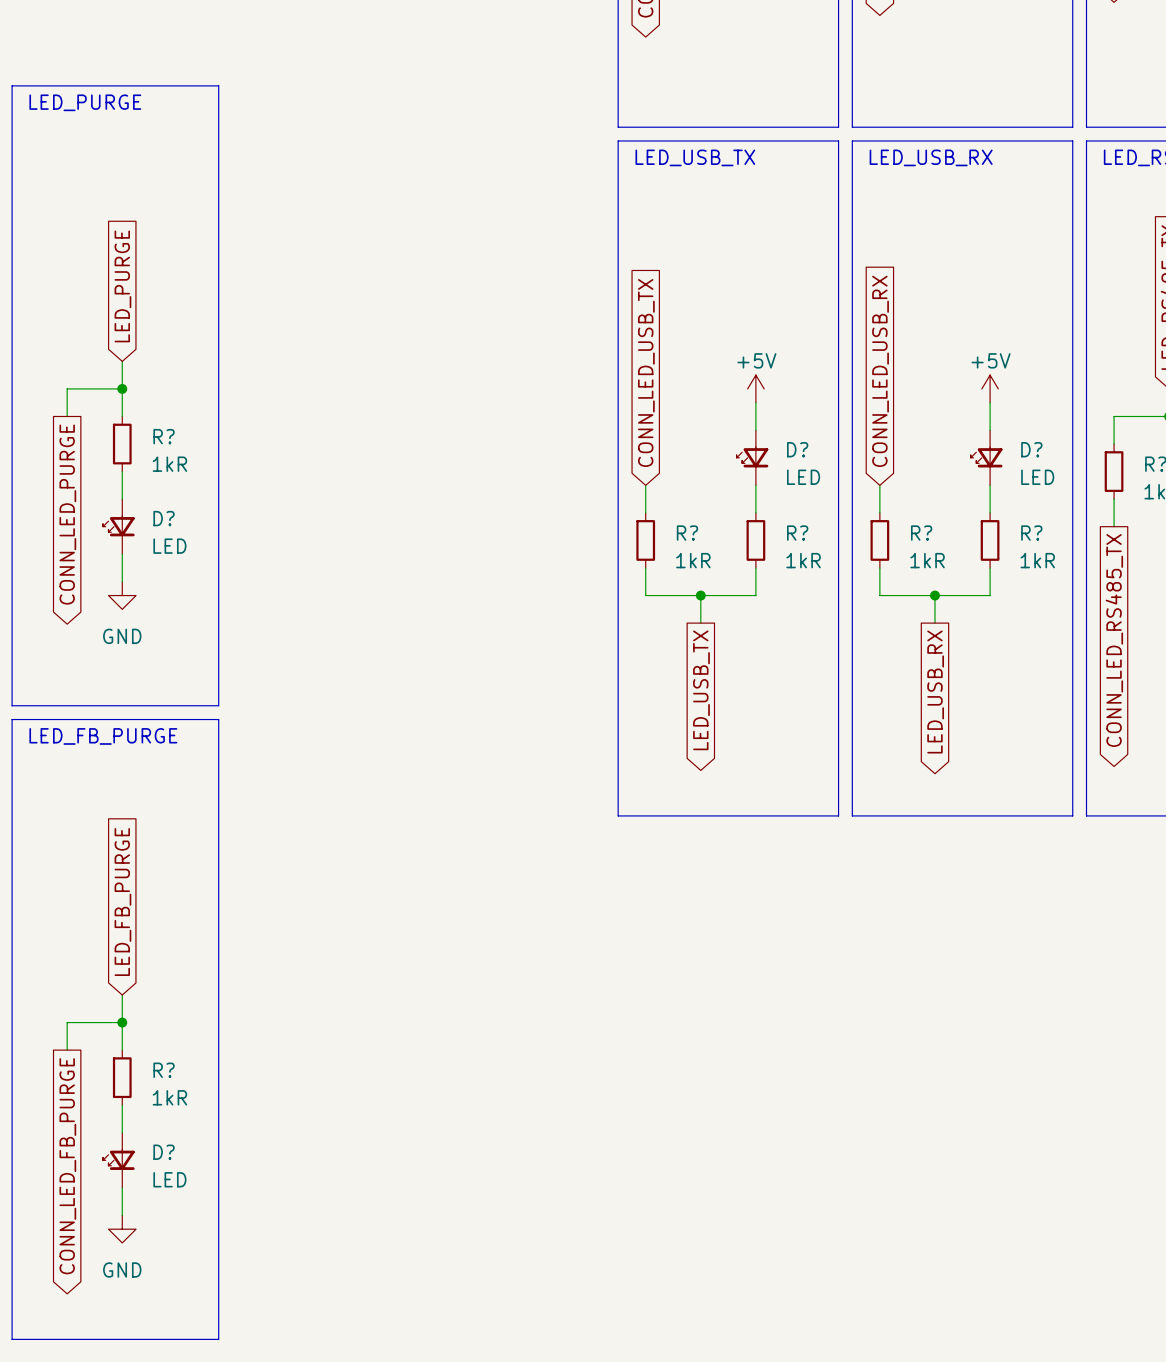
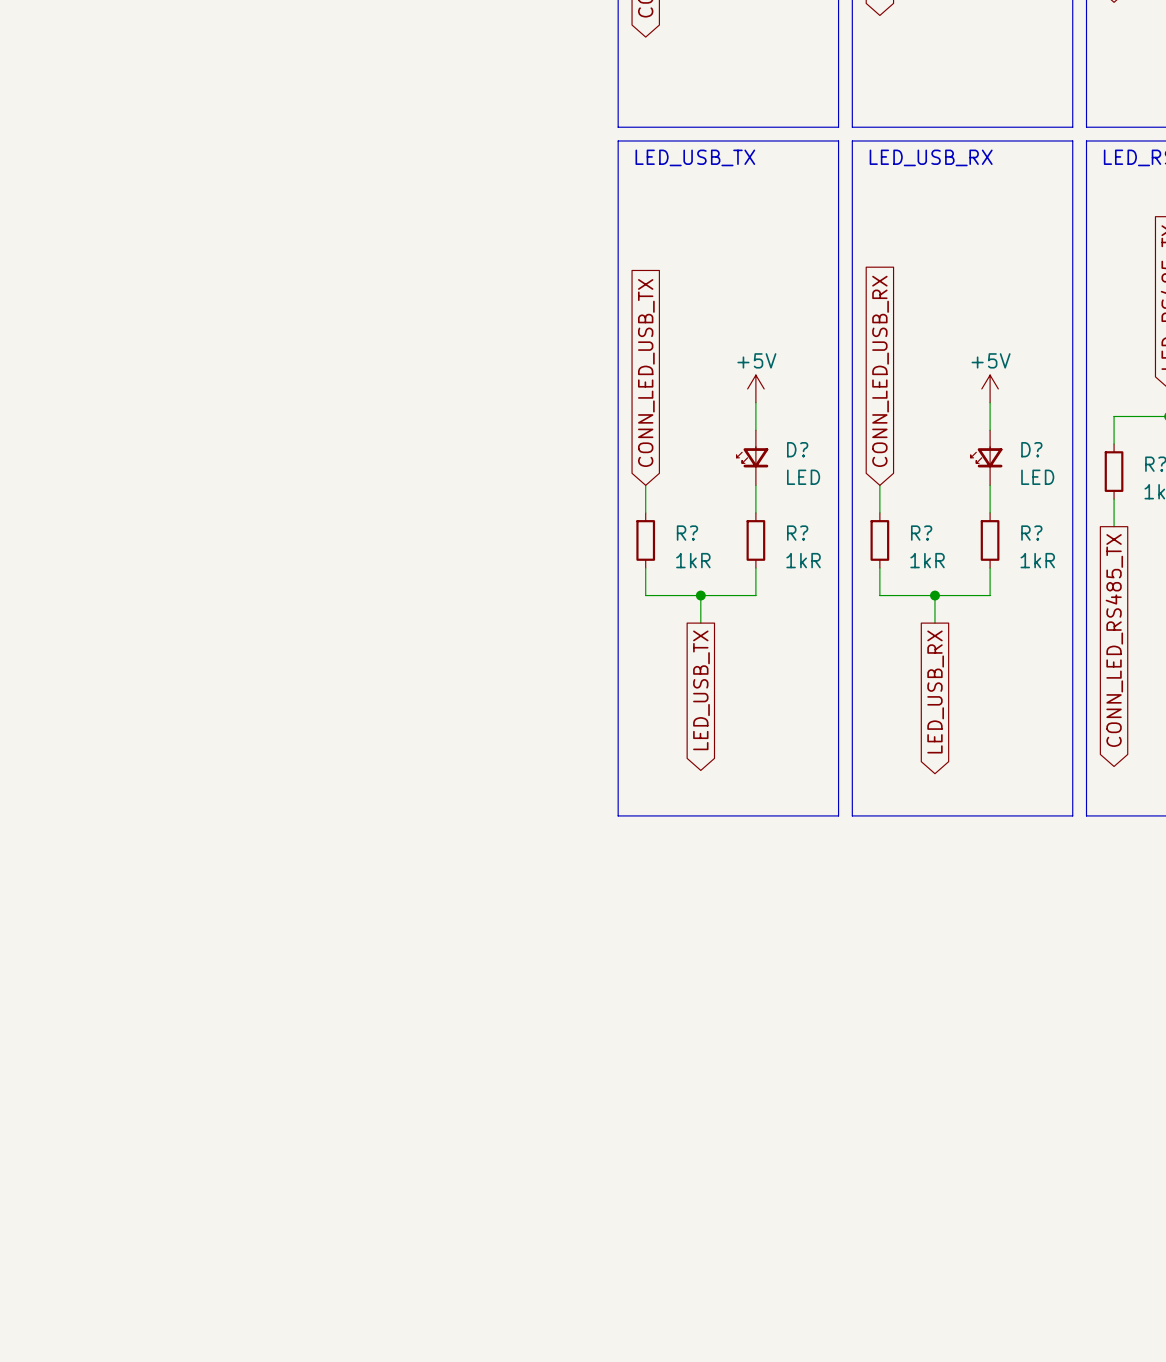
line: (12, 85) (218, 85) (218, 705) (12, 705) (12, 85) -> none
text: LED_PURGE (85, 102) -> none
global label: LED_PURGE (122, 286) -> none
wire: (122, 361) (122, 416) -> none
wire: (122, 388) (67, 388) (67, 416) -> none
junction: (122, 388) -> none
R?: 1kR (122, 444) -> none
wire: (122, 471) (122, 499) -> none
global label: CONN_LED_PURGE (67, 514) -> none
D?: LED (118, 526) -> none
wire: (122, 554) (122, 581) -> none
power symbol: GND (122, 595) -> none
line: (12, 719) (12, 1339) (218, 1339) (218, 719) (12, 719) -> none
text: LED_FB_PURGE (103, 736) -> none
global label: LED_FB_PURGE (122, 902) -> none
wire: (122, 995) (122, 1050) -> none
wire: (122, 1022) (67, 1022) (67, 1050) -> none
junction: (122, 1022) -> none
R?: 1kR (122, 1077) -> none
wire: (122, 1105) (122, 1132) -> none
D?: LED (118, 1160) -> none
global label: CONN_LED_FB_PURGE (67, 1166) -> none
wire: (122, 1187) (122, 1215) -> none
power symbol: GND (122, 1229) -> none

